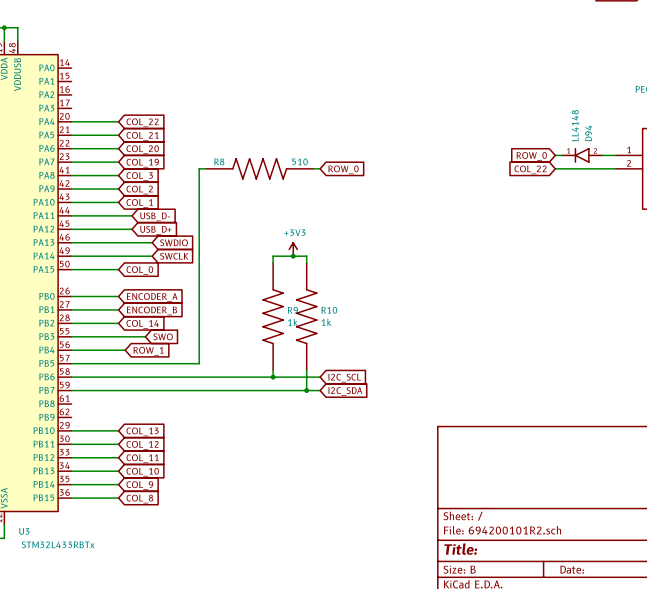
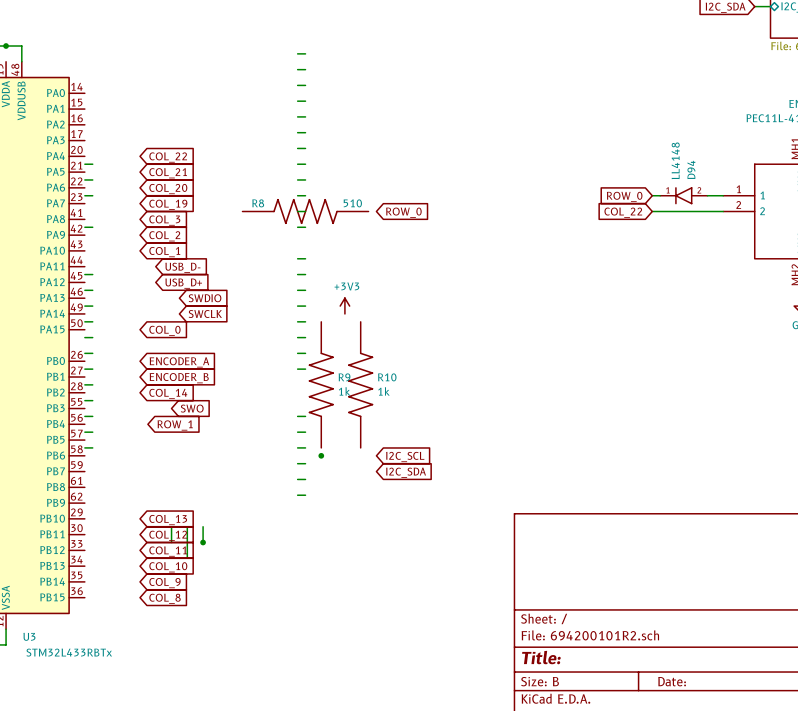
wire: (4, 27) (4, 41) -> none
wire: none -> (297, 53) (305, 53)
wire: none -> (297, 69) (305, 69)
wire: none -> (297, 85) (305, 85)
wire: none -> (297, 101) (305, 101)
wire: none -> (297, 116) (305, 116)
wire: none -> (297, 132) (305, 132)
wire: none -> (297, 148) (305, 148)
wire: (71, 121) (118, 121) -> none
wire: none -> (84, 164) (92, 164)
wire: none -> (297, 164) (305, 164)
wire: (71, 135) (118, 135) -> none
wire: none -> (84, 179) (92, 179)
wire: none -> (297, 179) (305, 179)
wire: (71, 148) (118, 148) -> none
wire: none -> (84, 195) (92, 195)
wire: none -> (297, 195) (305, 195)
wire: (71, 162) (118, 162) -> none
wire: (205, 168) (199, 168) (199, 363) (71, 363) -> none
wire: (313, 168) (320, 168) -> (297, 211) (305, 211)
wire: (71, 175) (118, 175) -> none
wire: none -> (84, 227) (92, 227)
wire: none -> (297, 227) (305, 227)
wire: (71, 189) (118, 189) -> none
wire: (71, 202) (118, 202) -> none
wire: none -> (297, 258) (305, 258)
wire: (71, 215) (132, 215) -> none
wire: none -> (84, 274) (92, 274)
wire: none -> (297, 274) (305, 274)
wire: (71, 229) (132, 229) -> none
wire: none -> (84, 290) (92, 290)
wire: none -> (297, 290) (305, 290)
wire: (71, 242) (152, 242) -> none
wire: none -> (84, 306) (92, 306)
wire: none -> (297, 306) (305, 306)
wire: (71, 256) (152, 256) -> none
junction: (293, 256) -> none
wire: none -> (84, 321) (92, 321)
wire: none -> (297, 321) (305, 321)
wire: (273, 262) (273, 256) (306, 256) (306, 262) -> none
wire: (71, 269) (118, 269) -> none
wire: none -> (84, 337) (92, 337)
wire: none -> (297, 337) (305, 337)
wire: none -> (84, 353) (92, 353)
wire: none -> (297, 353) (305, 353)
wire: (71, 296) (118, 296) -> none
wire: none -> (84, 369) (92, 369)
wire: none -> (297, 369) (305, 369)
wire: (71, 309) (118, 309) -> none
wire: none -> (84, 384) (92, 384)
wire: (71, 323) (118, 323) -> none
wire: none -> (84, 400) (92, 400)
wire: (71, 336) (145, 336) -> none
wire: none -> (84, 416) (92, 416)
wire: none -> (297, 416) (305, 416)
wire: (71, 350) (125, 350) -> none
wire: none -> (84, 432) (92, 432)
wire: none -> (297, 432) (305, 432)
wire: none -> (84, 447) (92, 447)
wire: none -> (297, 447) (305, 447)
wire: (273, 370) (273, 377) -> none
wire: (306, 370) (306, 390) -> none
wire: (71, 377) (320, 377) -> none
wire: none -> (297, 463) (305, 463)
wire: (71, 390) (320, 390) -> none
junction: (306, 390) -> none
wire: none -> (297, 479) (305, 479)
wire: none -> (297, 495) (305, 495)
wire: (71, 430) (118, 430) -> none
wire: none -> (171, 526) (171, 542)
wire: none -> (187, 526) (187, 558)
wire: none -> (203, 526) (203, 542)
wire: (71, 444) (118, 444) -> none
junction: none -> (203, 542)
wire: (71, 457) (118, 457) -> none
wire: (71, 471) (118, 471) -> none
wire: (71, 484) (118, 484) -> none
wire: (71, 498) (118, 498) -> none

